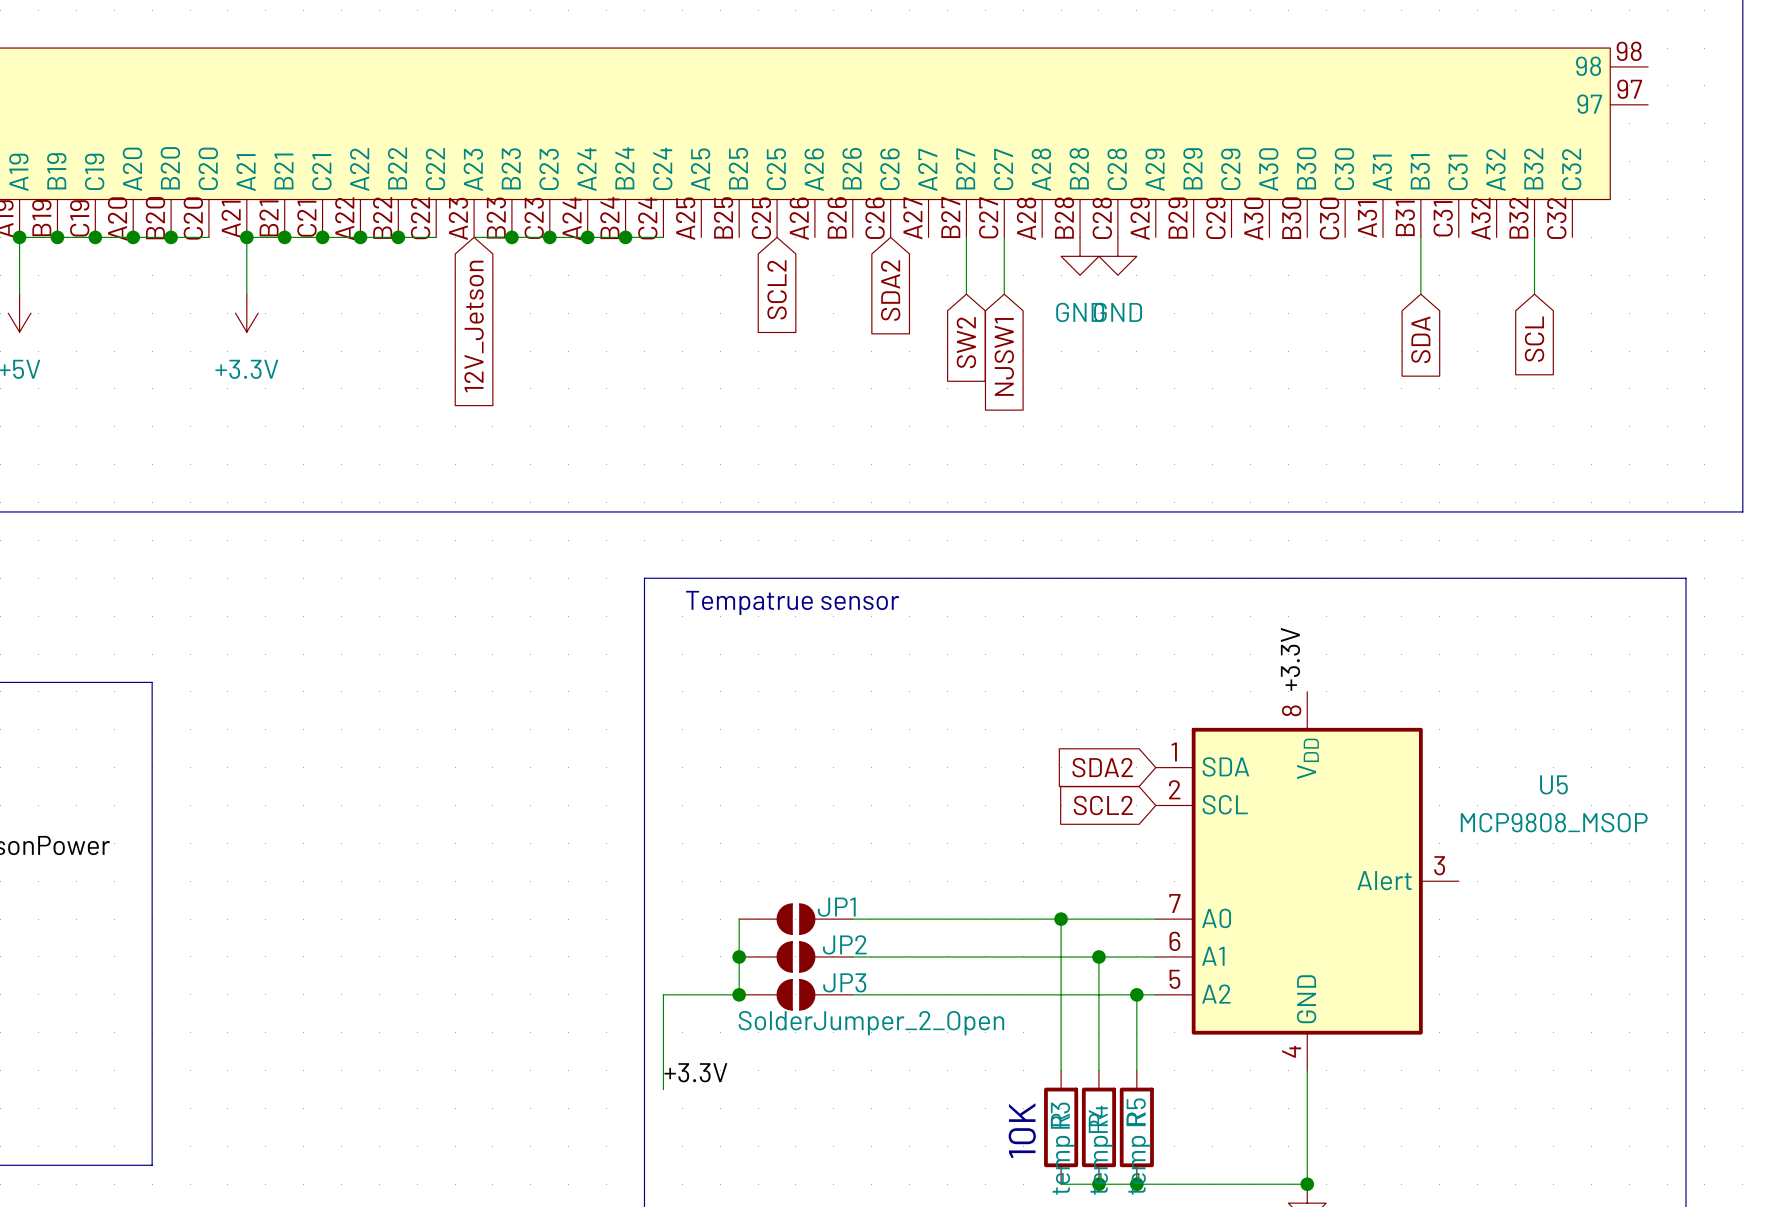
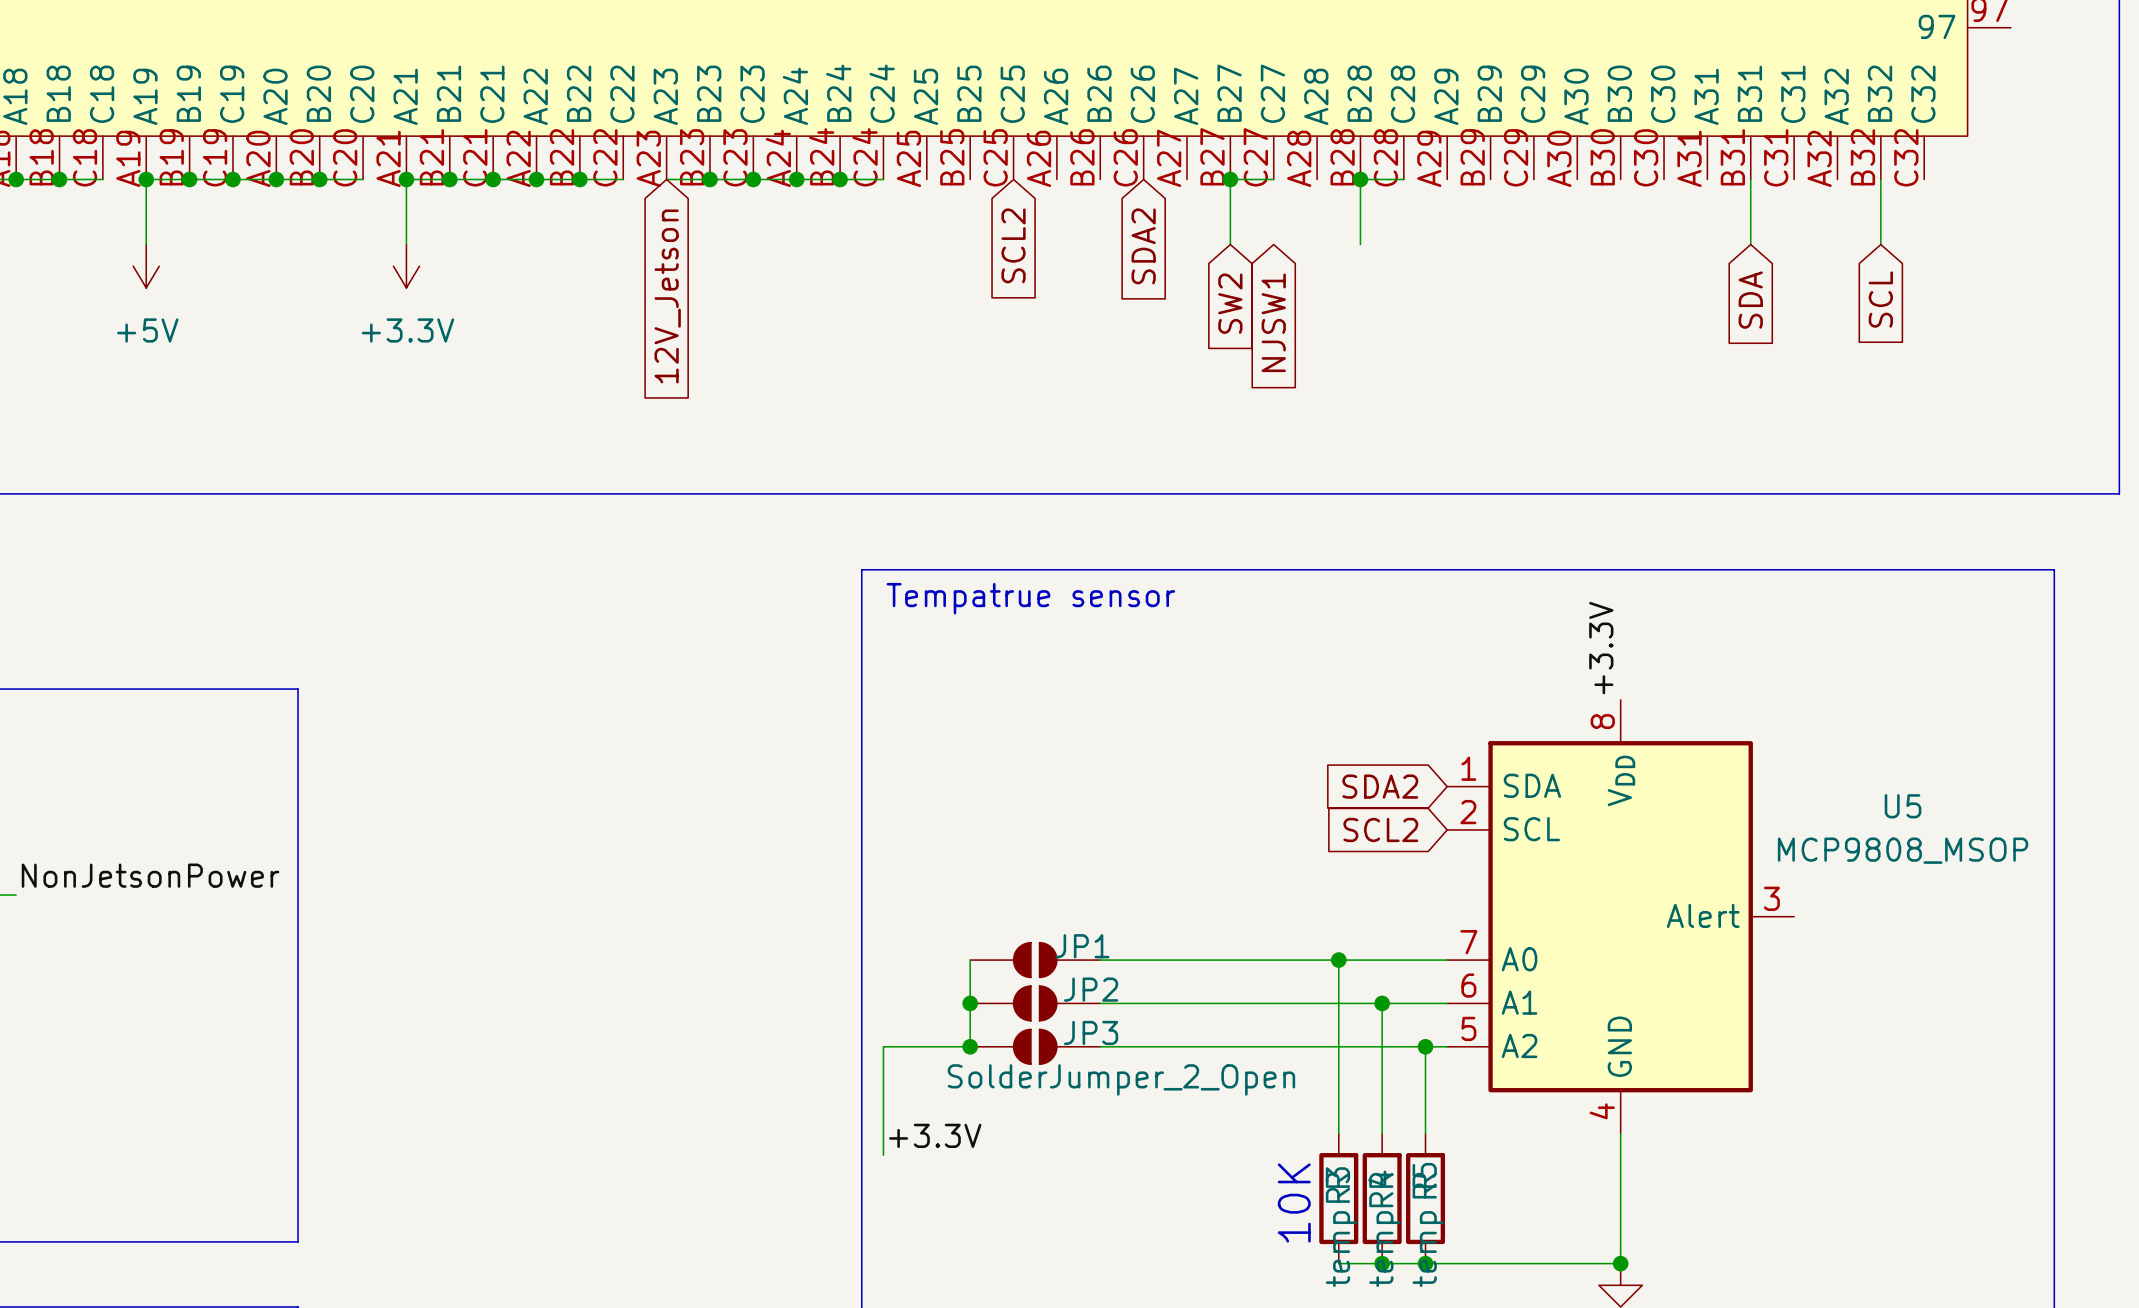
junction: none -> (1230, 179)
wire: (1004, 237) (1004, 294) -> (1273, 179) (1230, 179)
junction: none -> (1360, 179)
wire: none -> (1403, 179) (1360, 179) (1360, 244)
power symbol: GND (1080, 256) -> none
power symbol: GND (1117, 256) -> none

